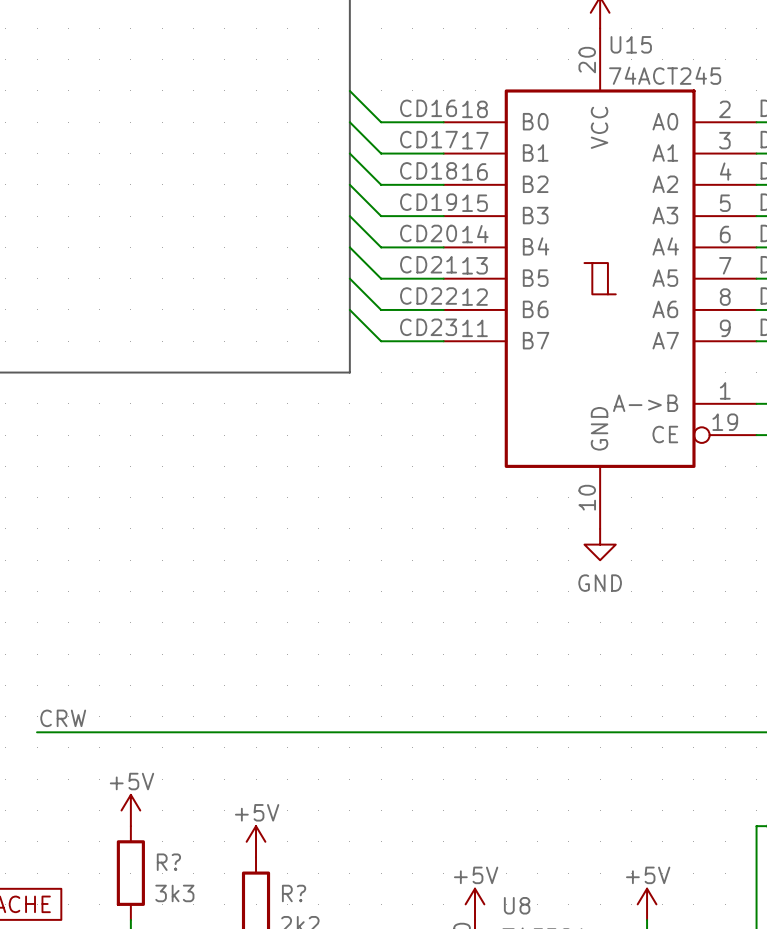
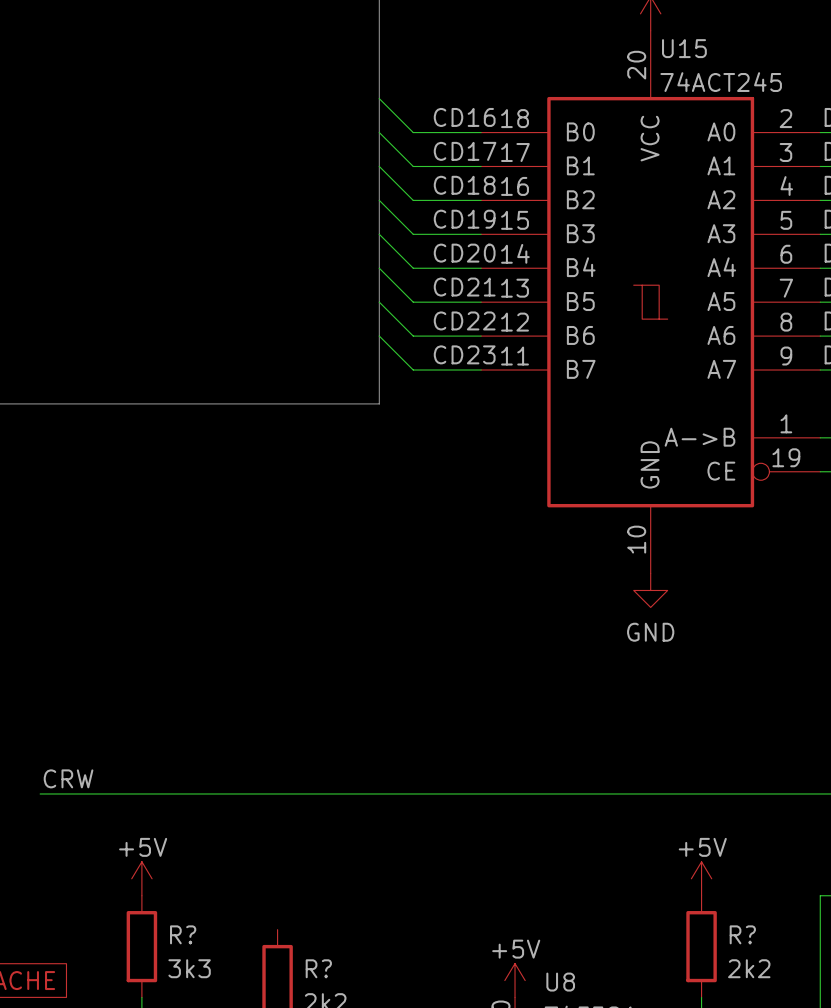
power symbol: +5V (256, 841) -> none
R?: none -> 2k2 (701, 946)
power symbol position: +5V (647, 904) -> +5V (701, 878)

